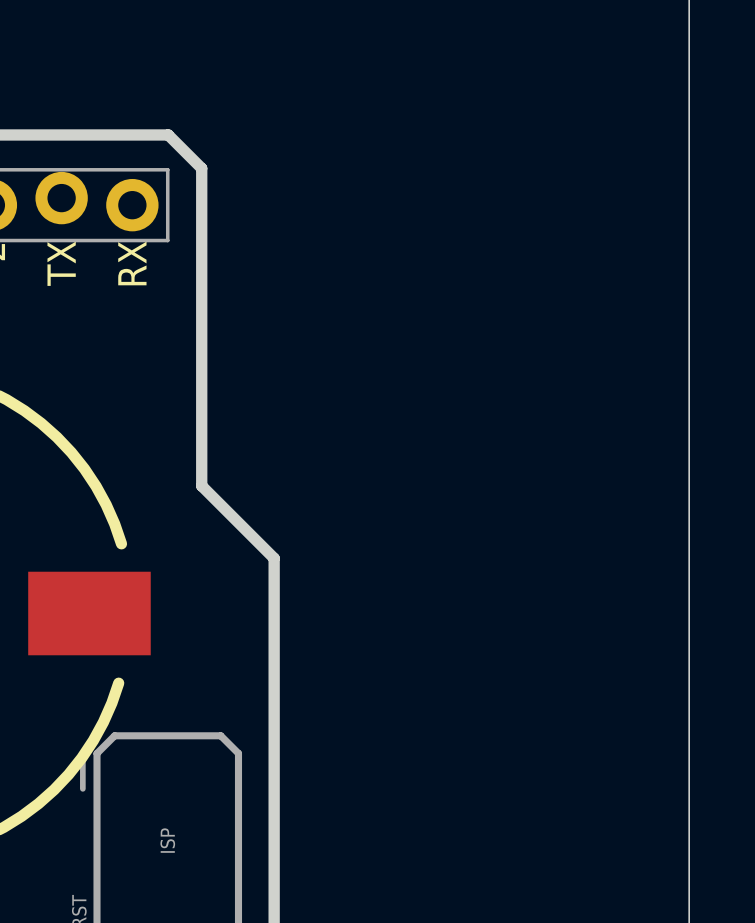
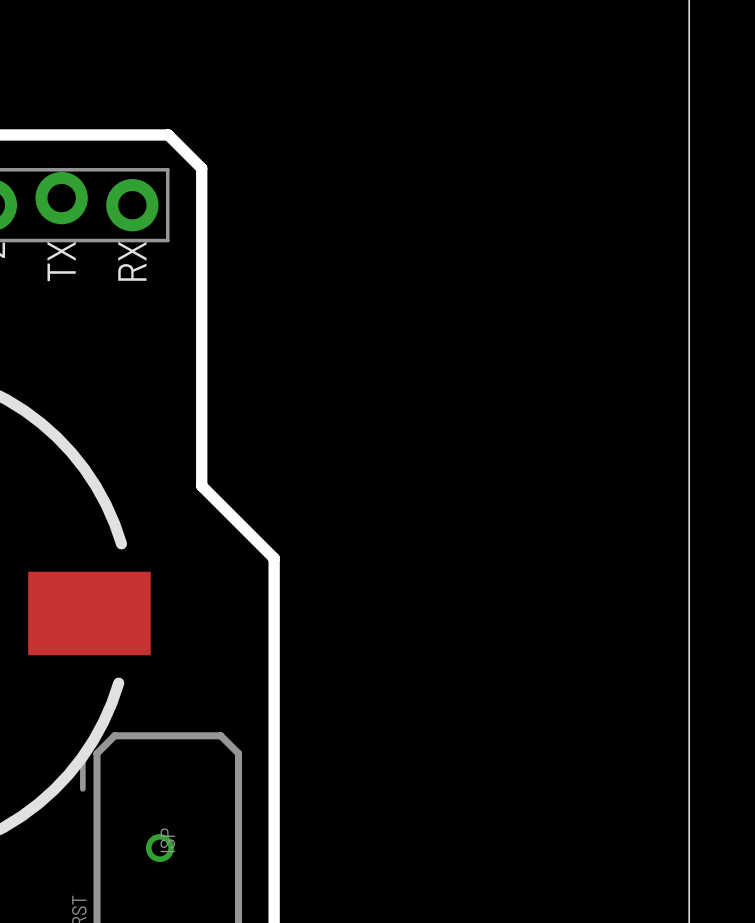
via: none -> (159, 848)

